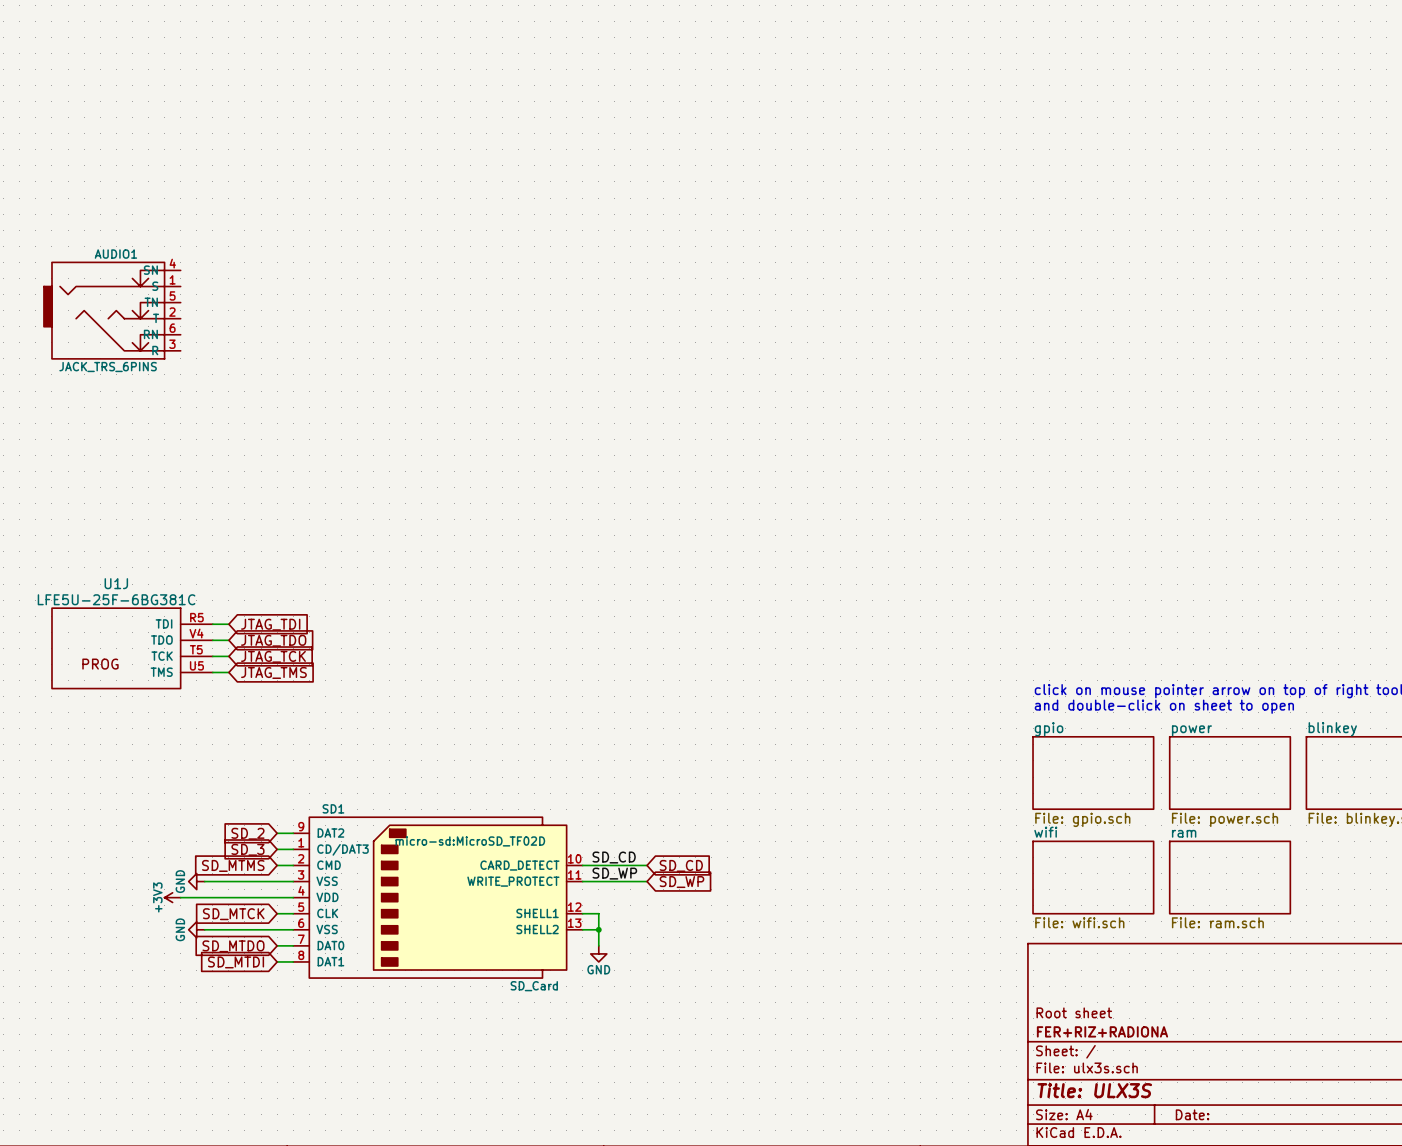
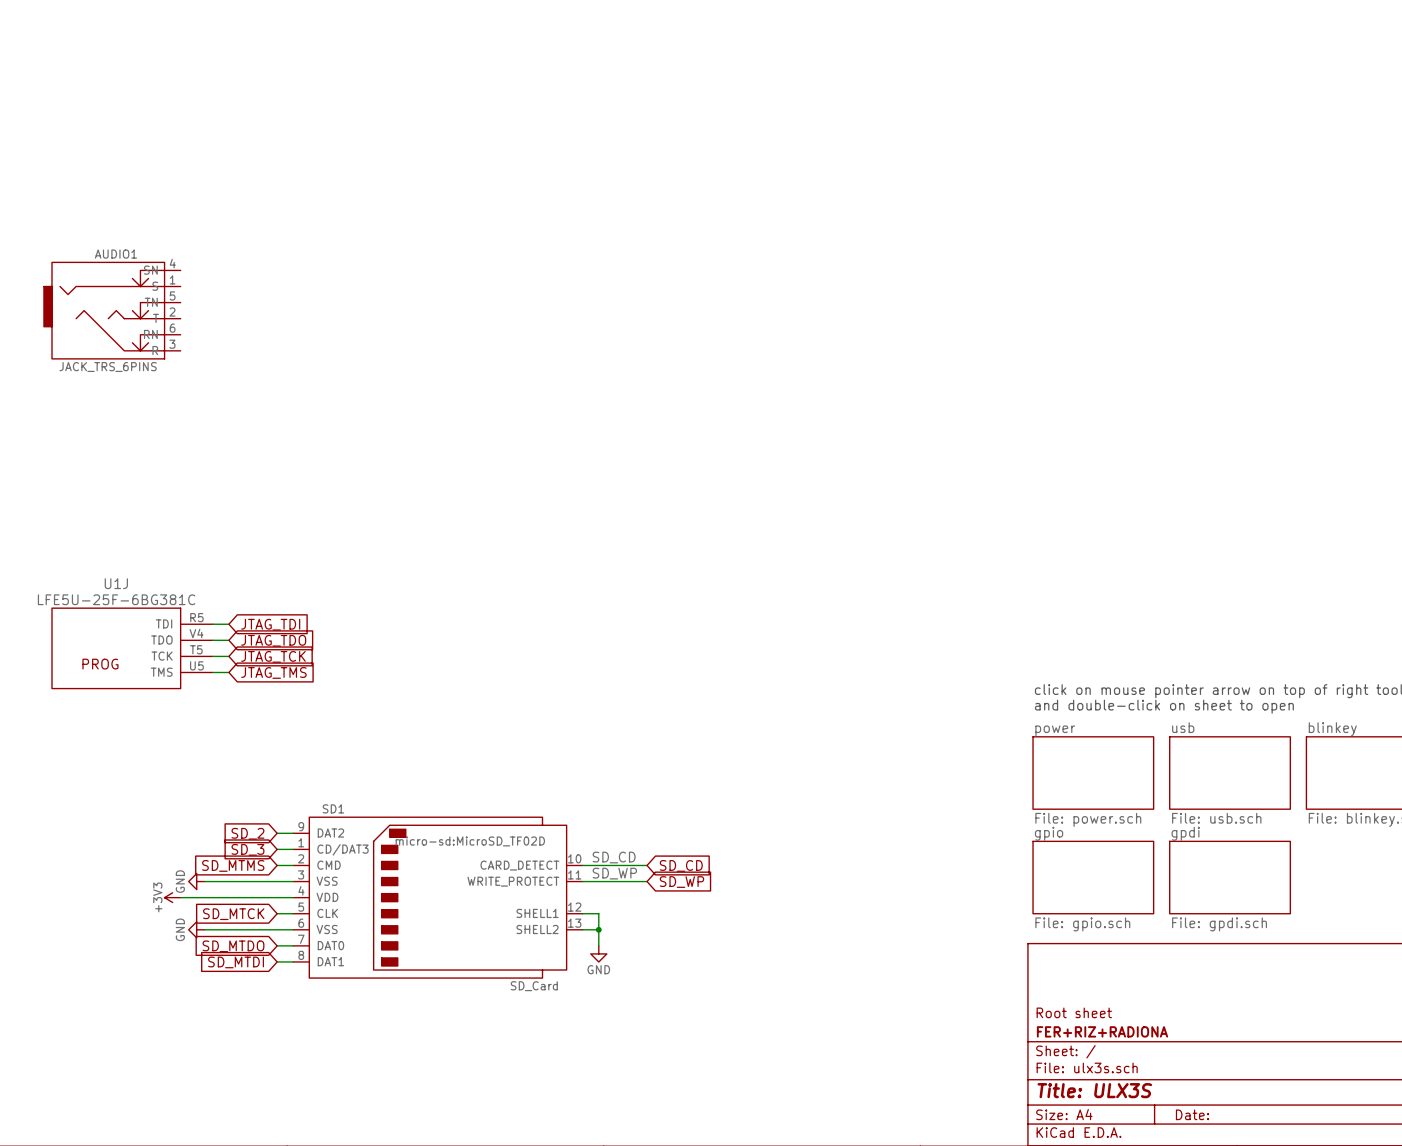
sheet gpio name: gpio (1049, 729) -> power (1055, 730)
sheet power name: power (1191, 730) -> usb (1183, 727)
sheet gpio value: File: gpio.sch (1082, 819) -> File: power.sch (1088, 819)
sheet power value: File: power.sch (1225, 819) -> File: usb.sch (1216, 818)
sheet wifi name: wifi (1045, 832) -> gpio (1049, 833)
sheet ram name: ram (1184, 833) -> gpdi (1185, 833)
sheet wifi value: File: wifi.sch (1079, 922) -> File: gpio.sch (1082, 924)
sheet ram value: File: ram.sch (1217, 922) -> File: gpdi.sch (1219, 924)

